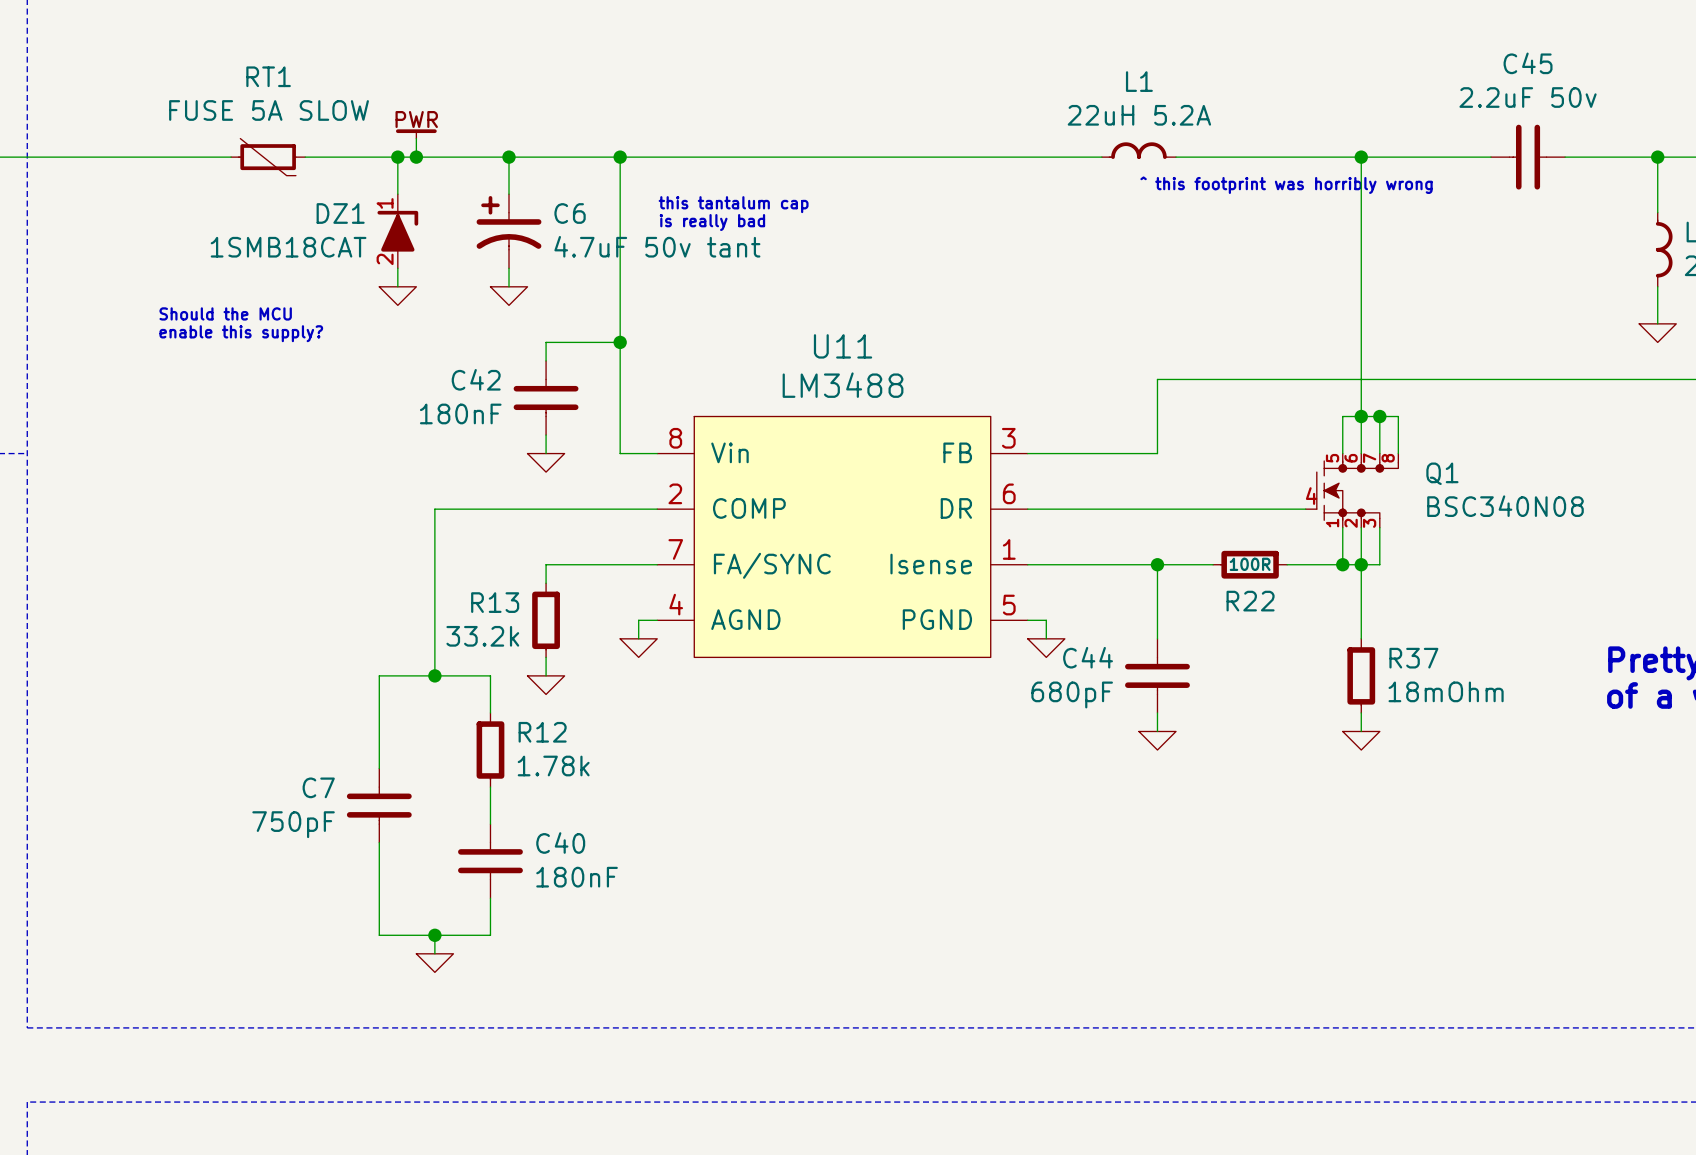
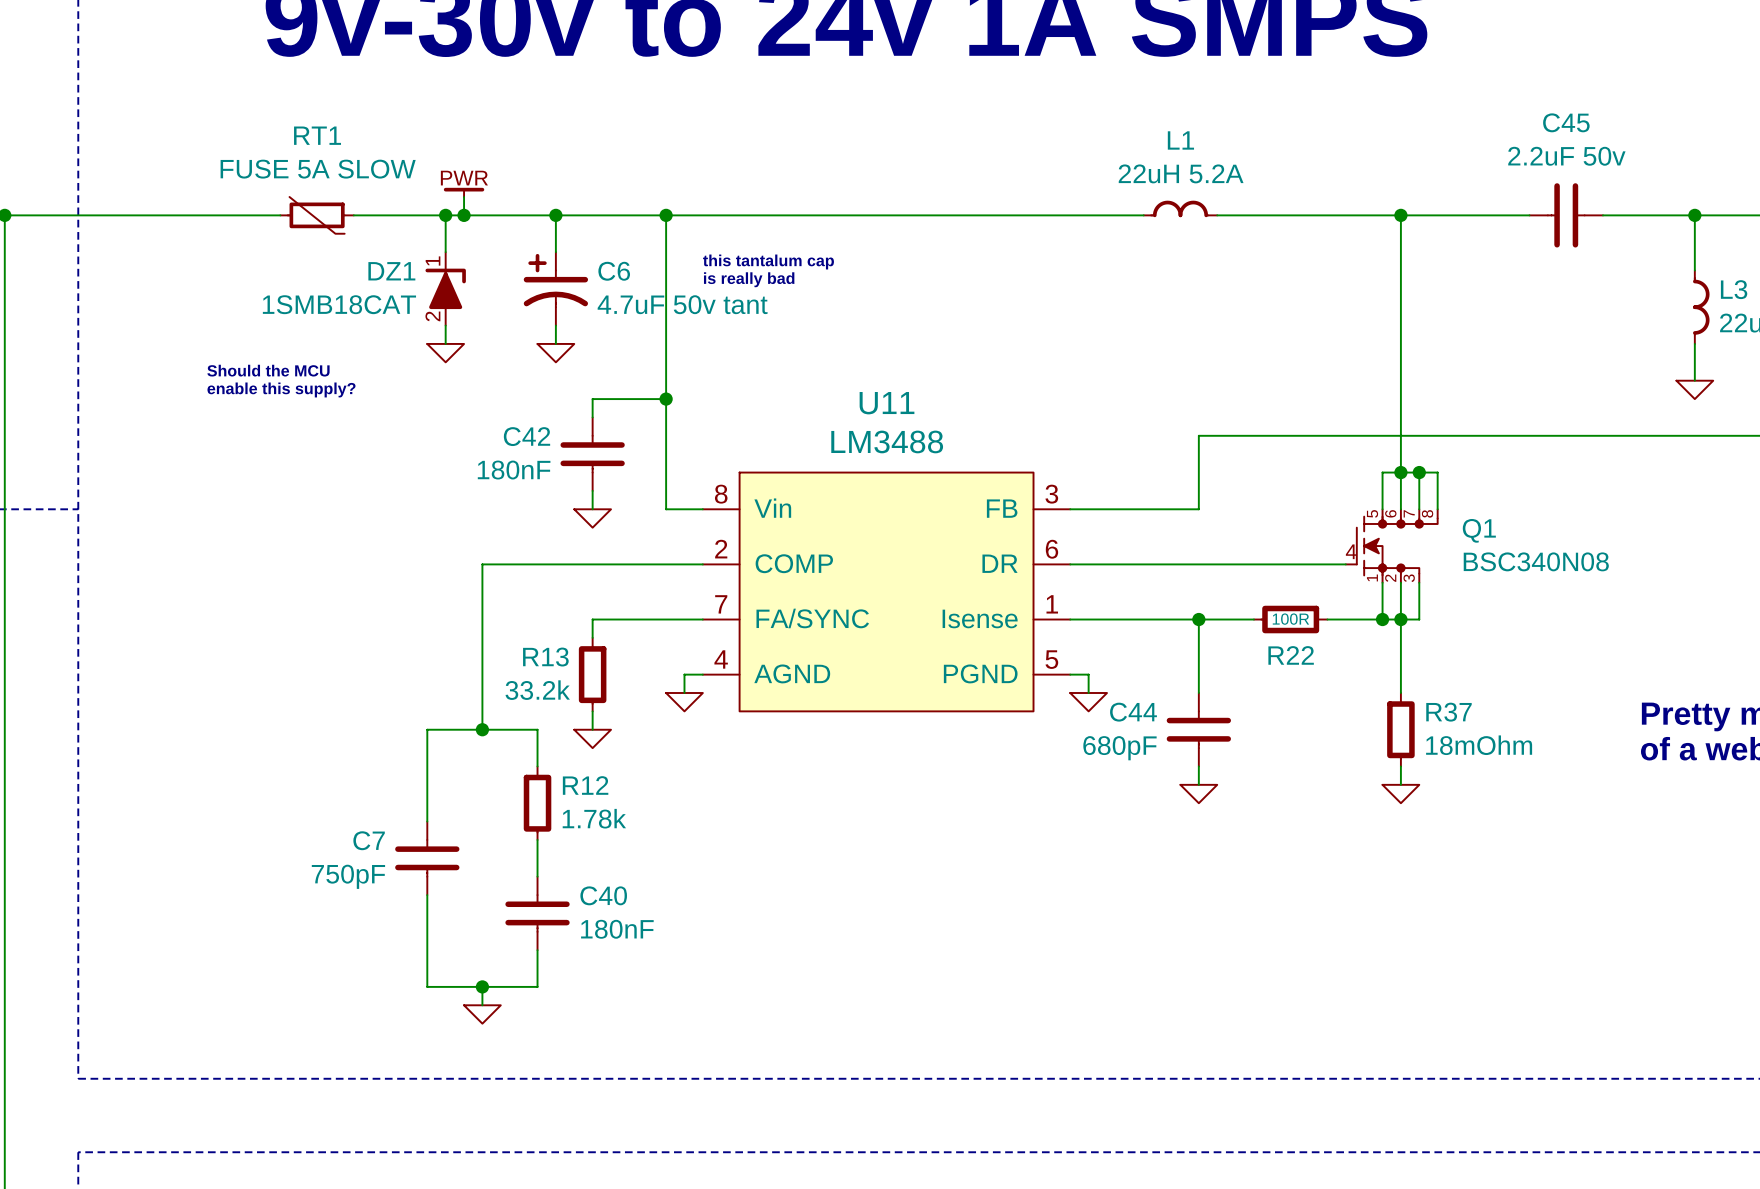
text: ^ this footprint was horribly wrong (1286, 185) -> none

